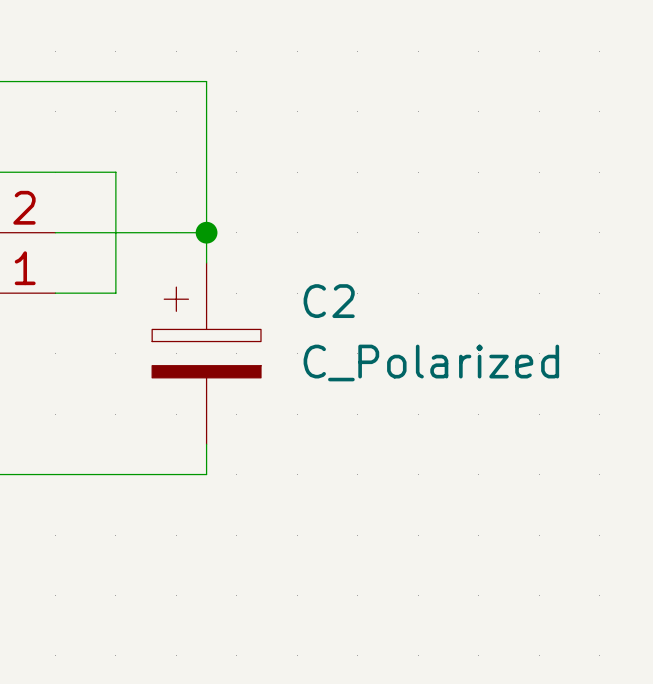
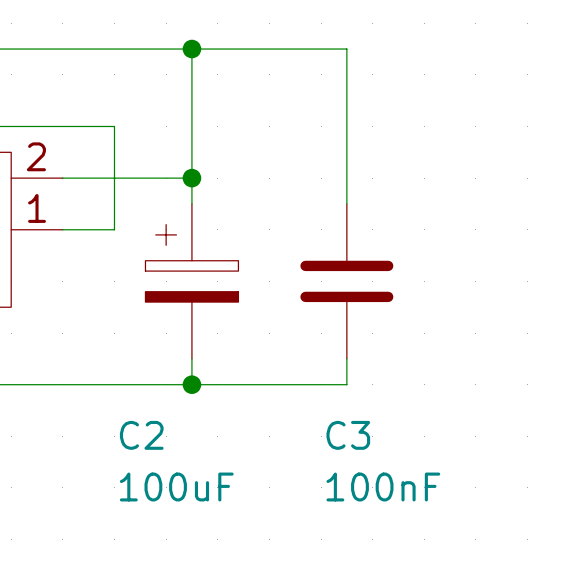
wire: none -> (191, 49) (346, 49) (346, 203)
junction: none -> (191, 49)
C2 name position: C2 (329, 301) -> C2 (141, 435)
C3: none -> 100nF (346, 281)
C2 value: C_Polarized (431, 362) -> 100uF (176, 487)
wire: none -> (346, 358) (346, 384) (191, 384)
junction: none -> (191, 384)

